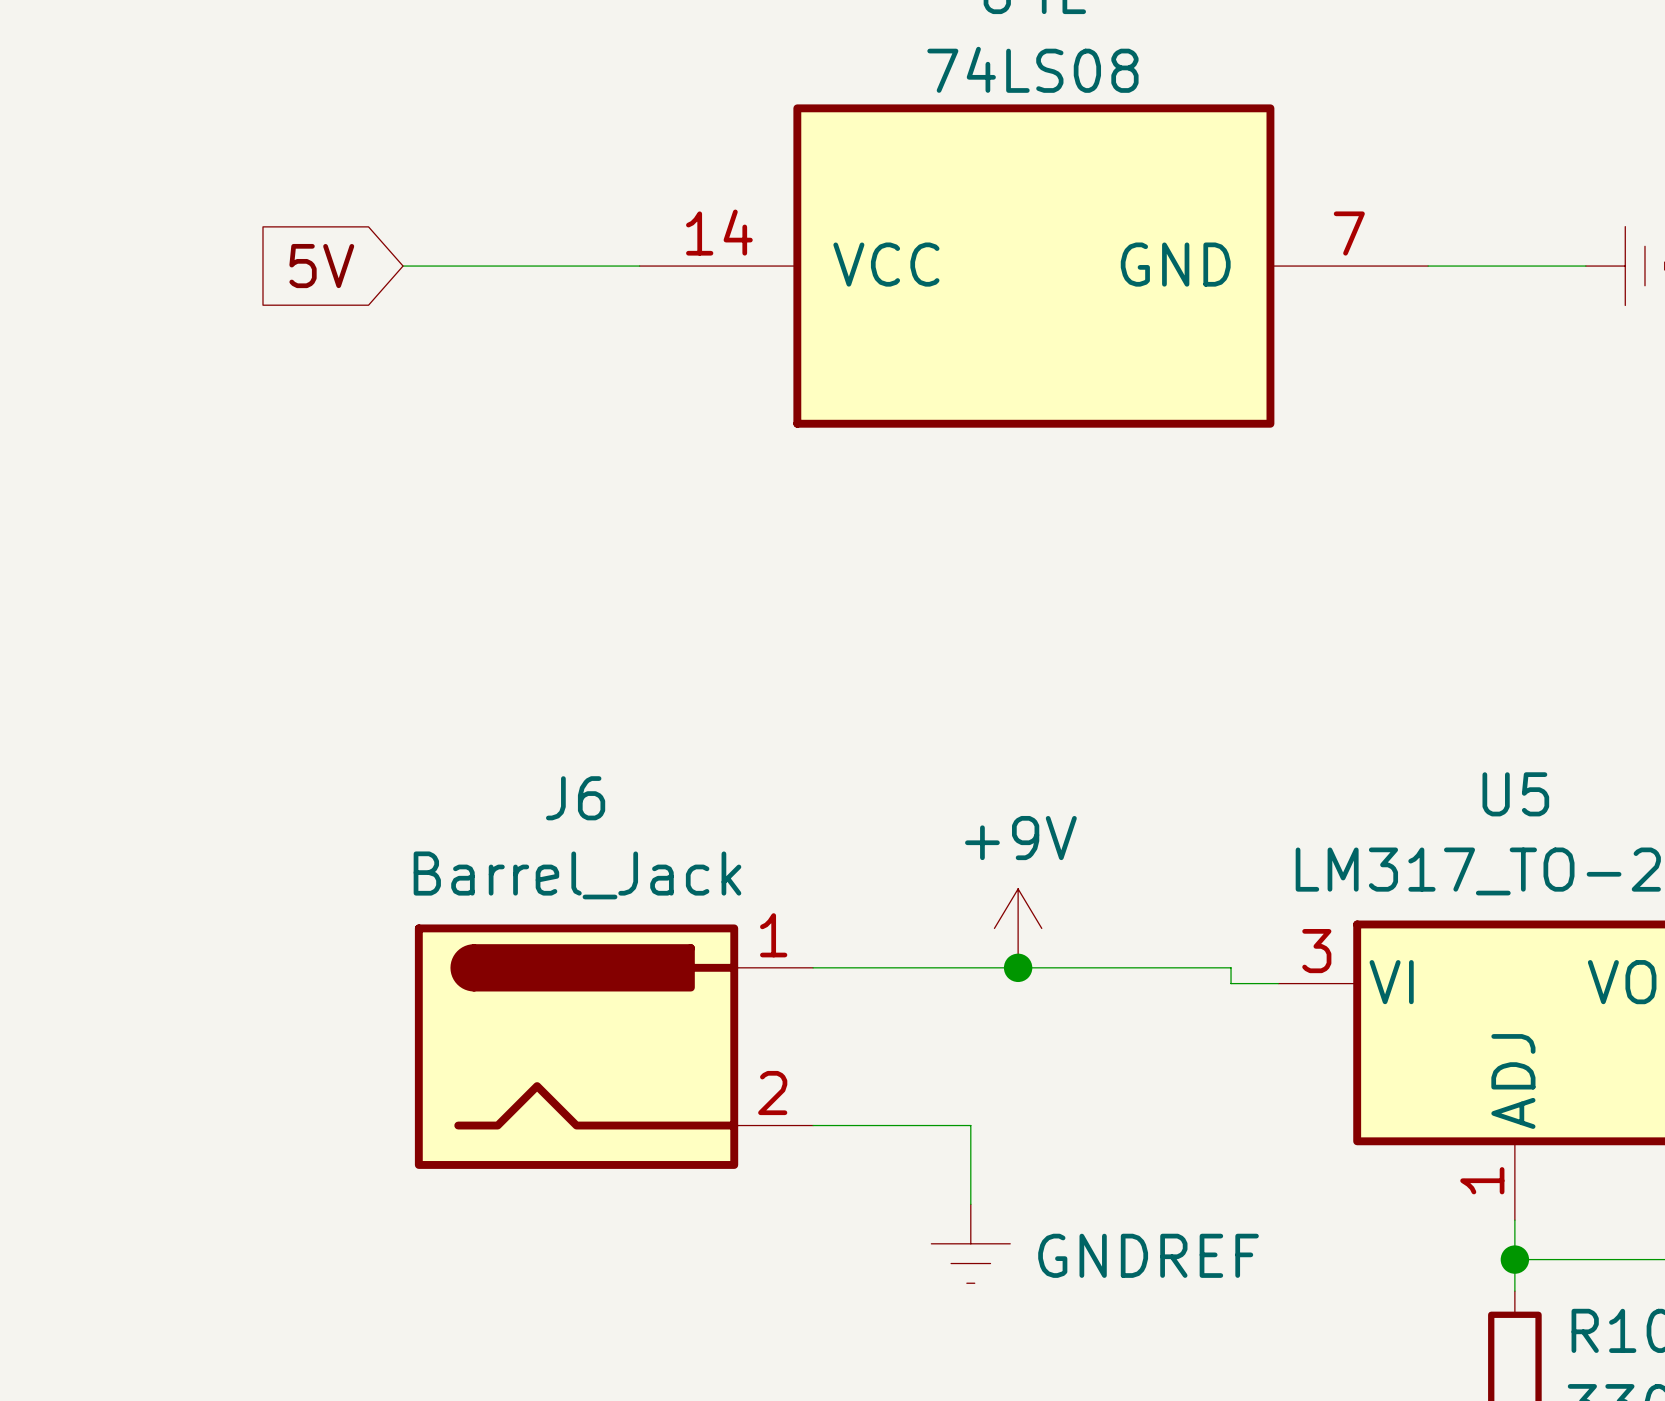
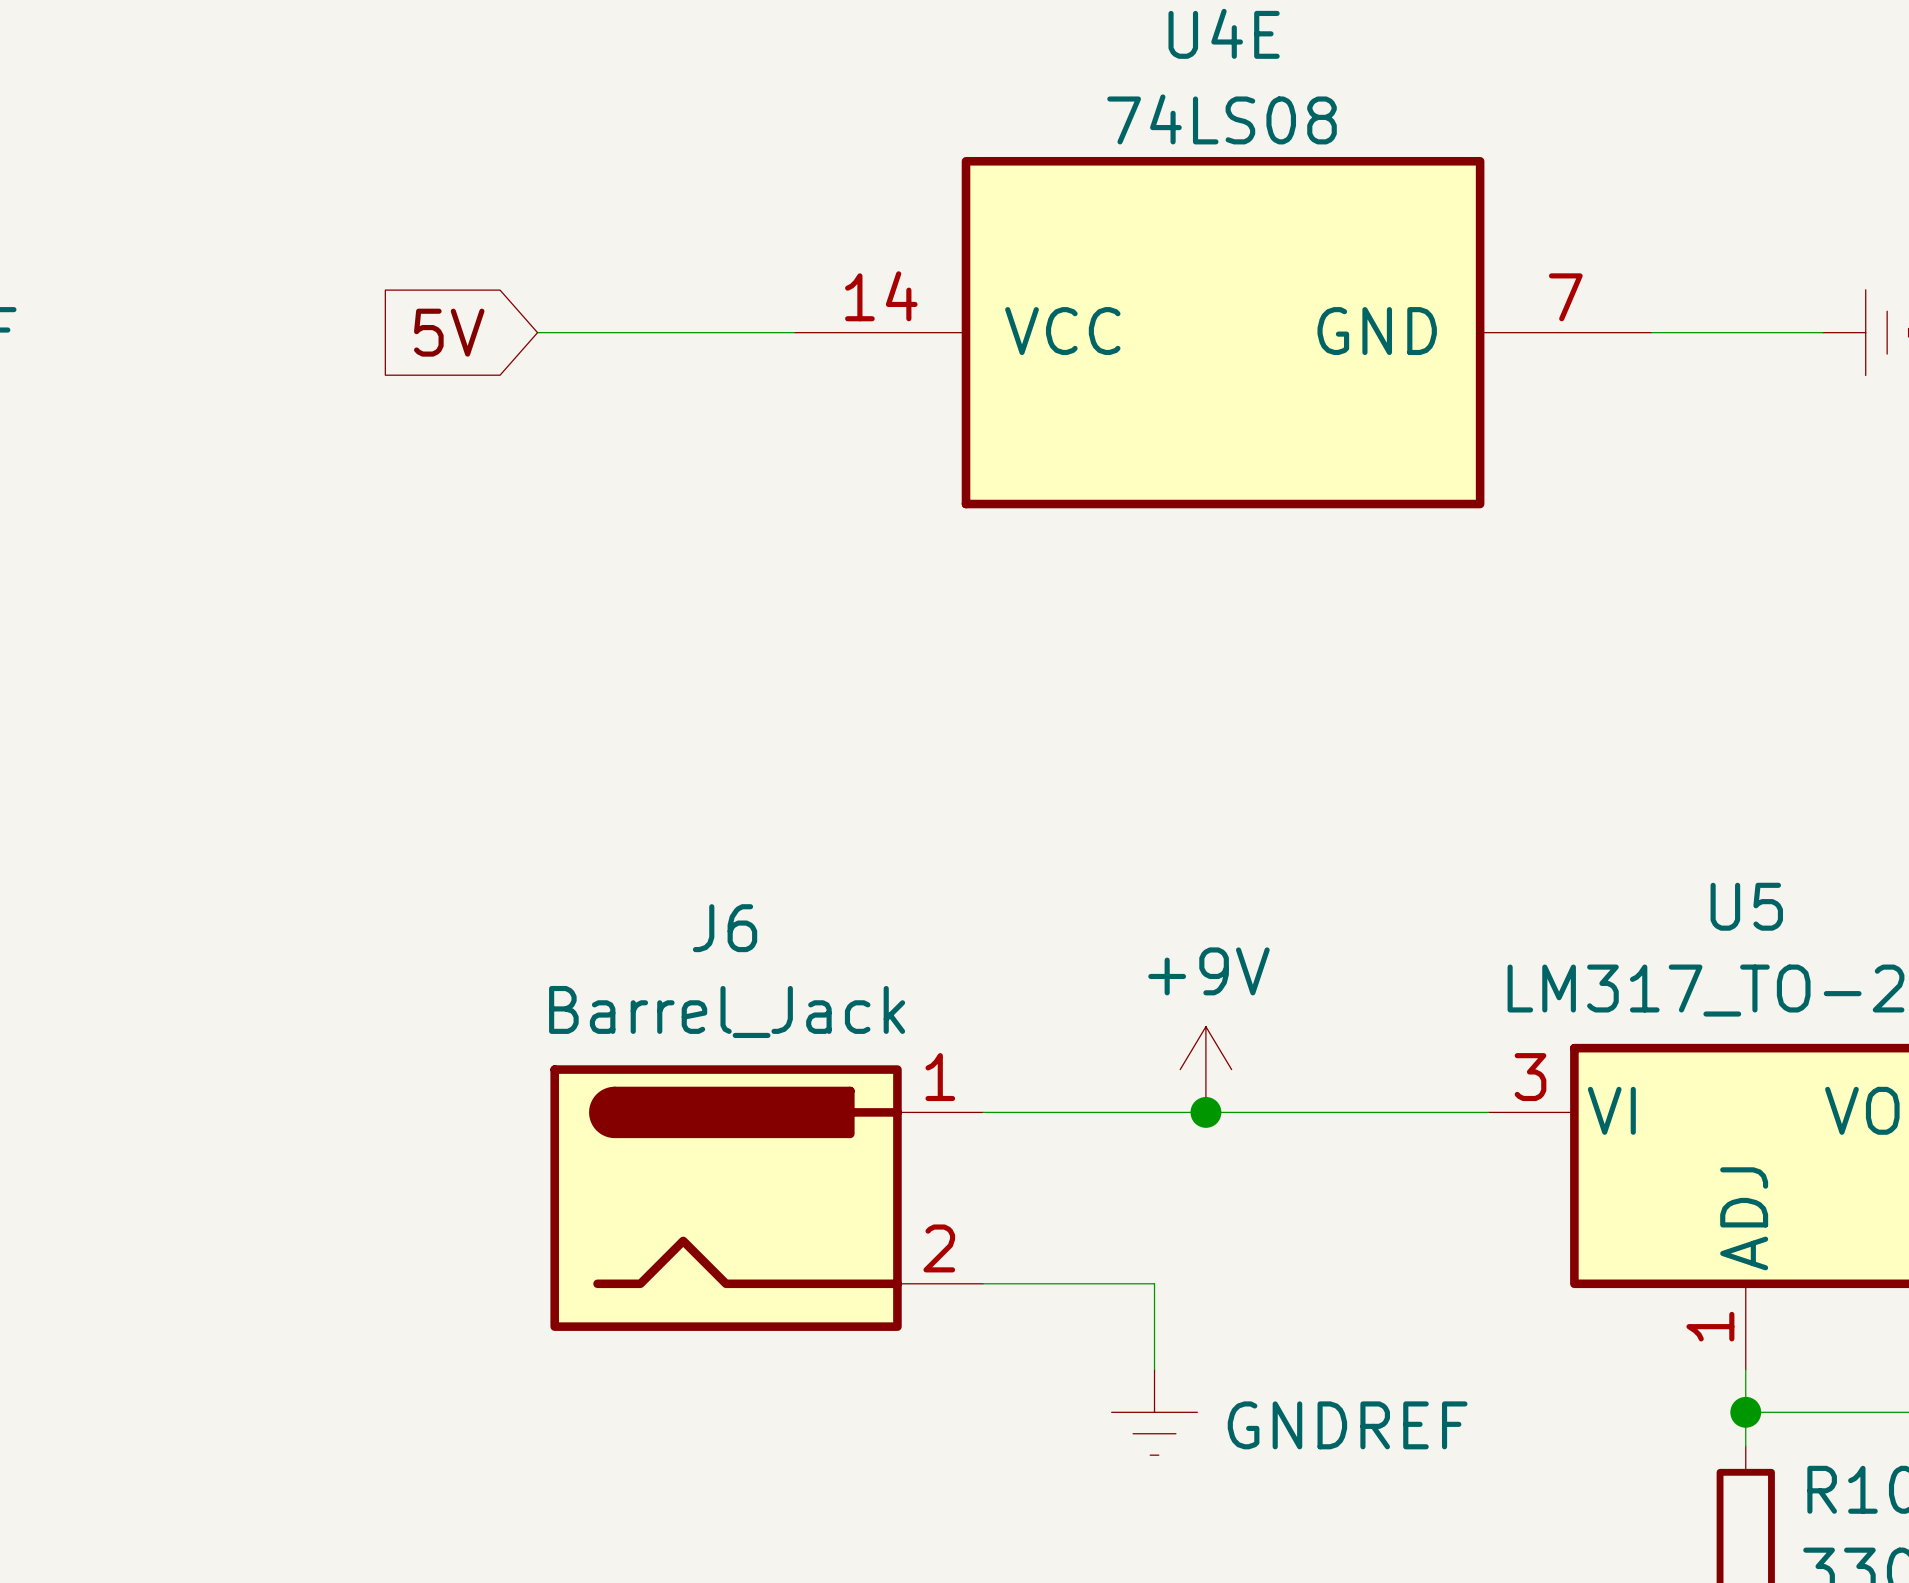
power symbol position: +9V (1018, 928) -> +9V (1205, 1069)
wire: (813, 967) (1231, 967) (1231, 983) -> (983, 1112) (1437, 1112)
junction position: (1018, 967) -> (1205, 1112)
J6 position: (613, 1046) -> (766, 1198)
wire: (813, 1125) (970, 1125) (970, 1141) -> (983, 1283) (1154, 1283)
power symbol position: GNDREF (970, 1243) -> GNDREF (1154, 1412)

